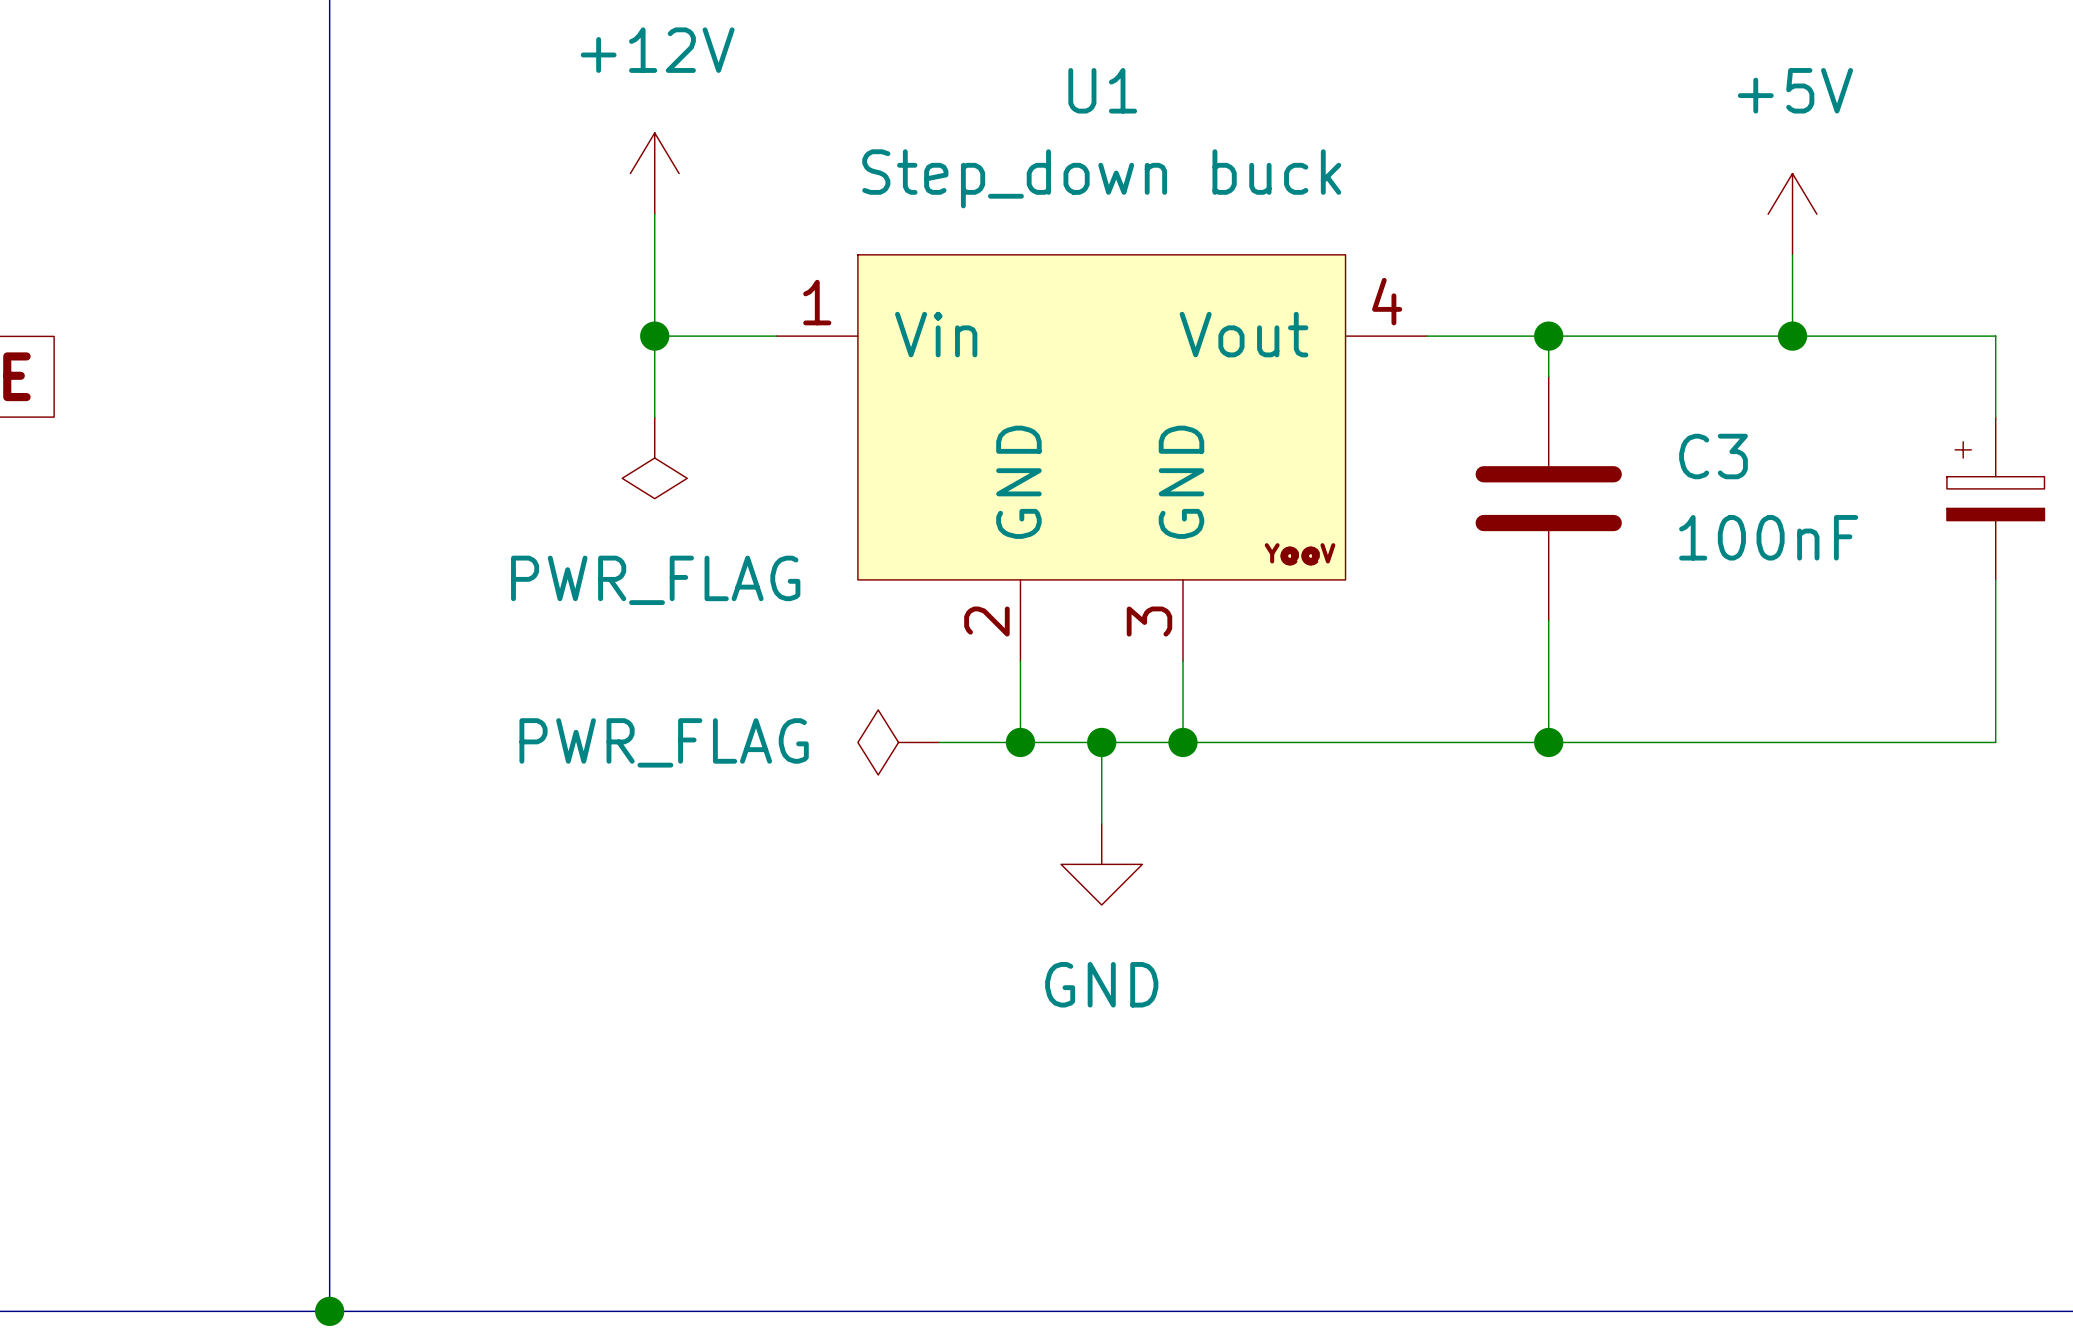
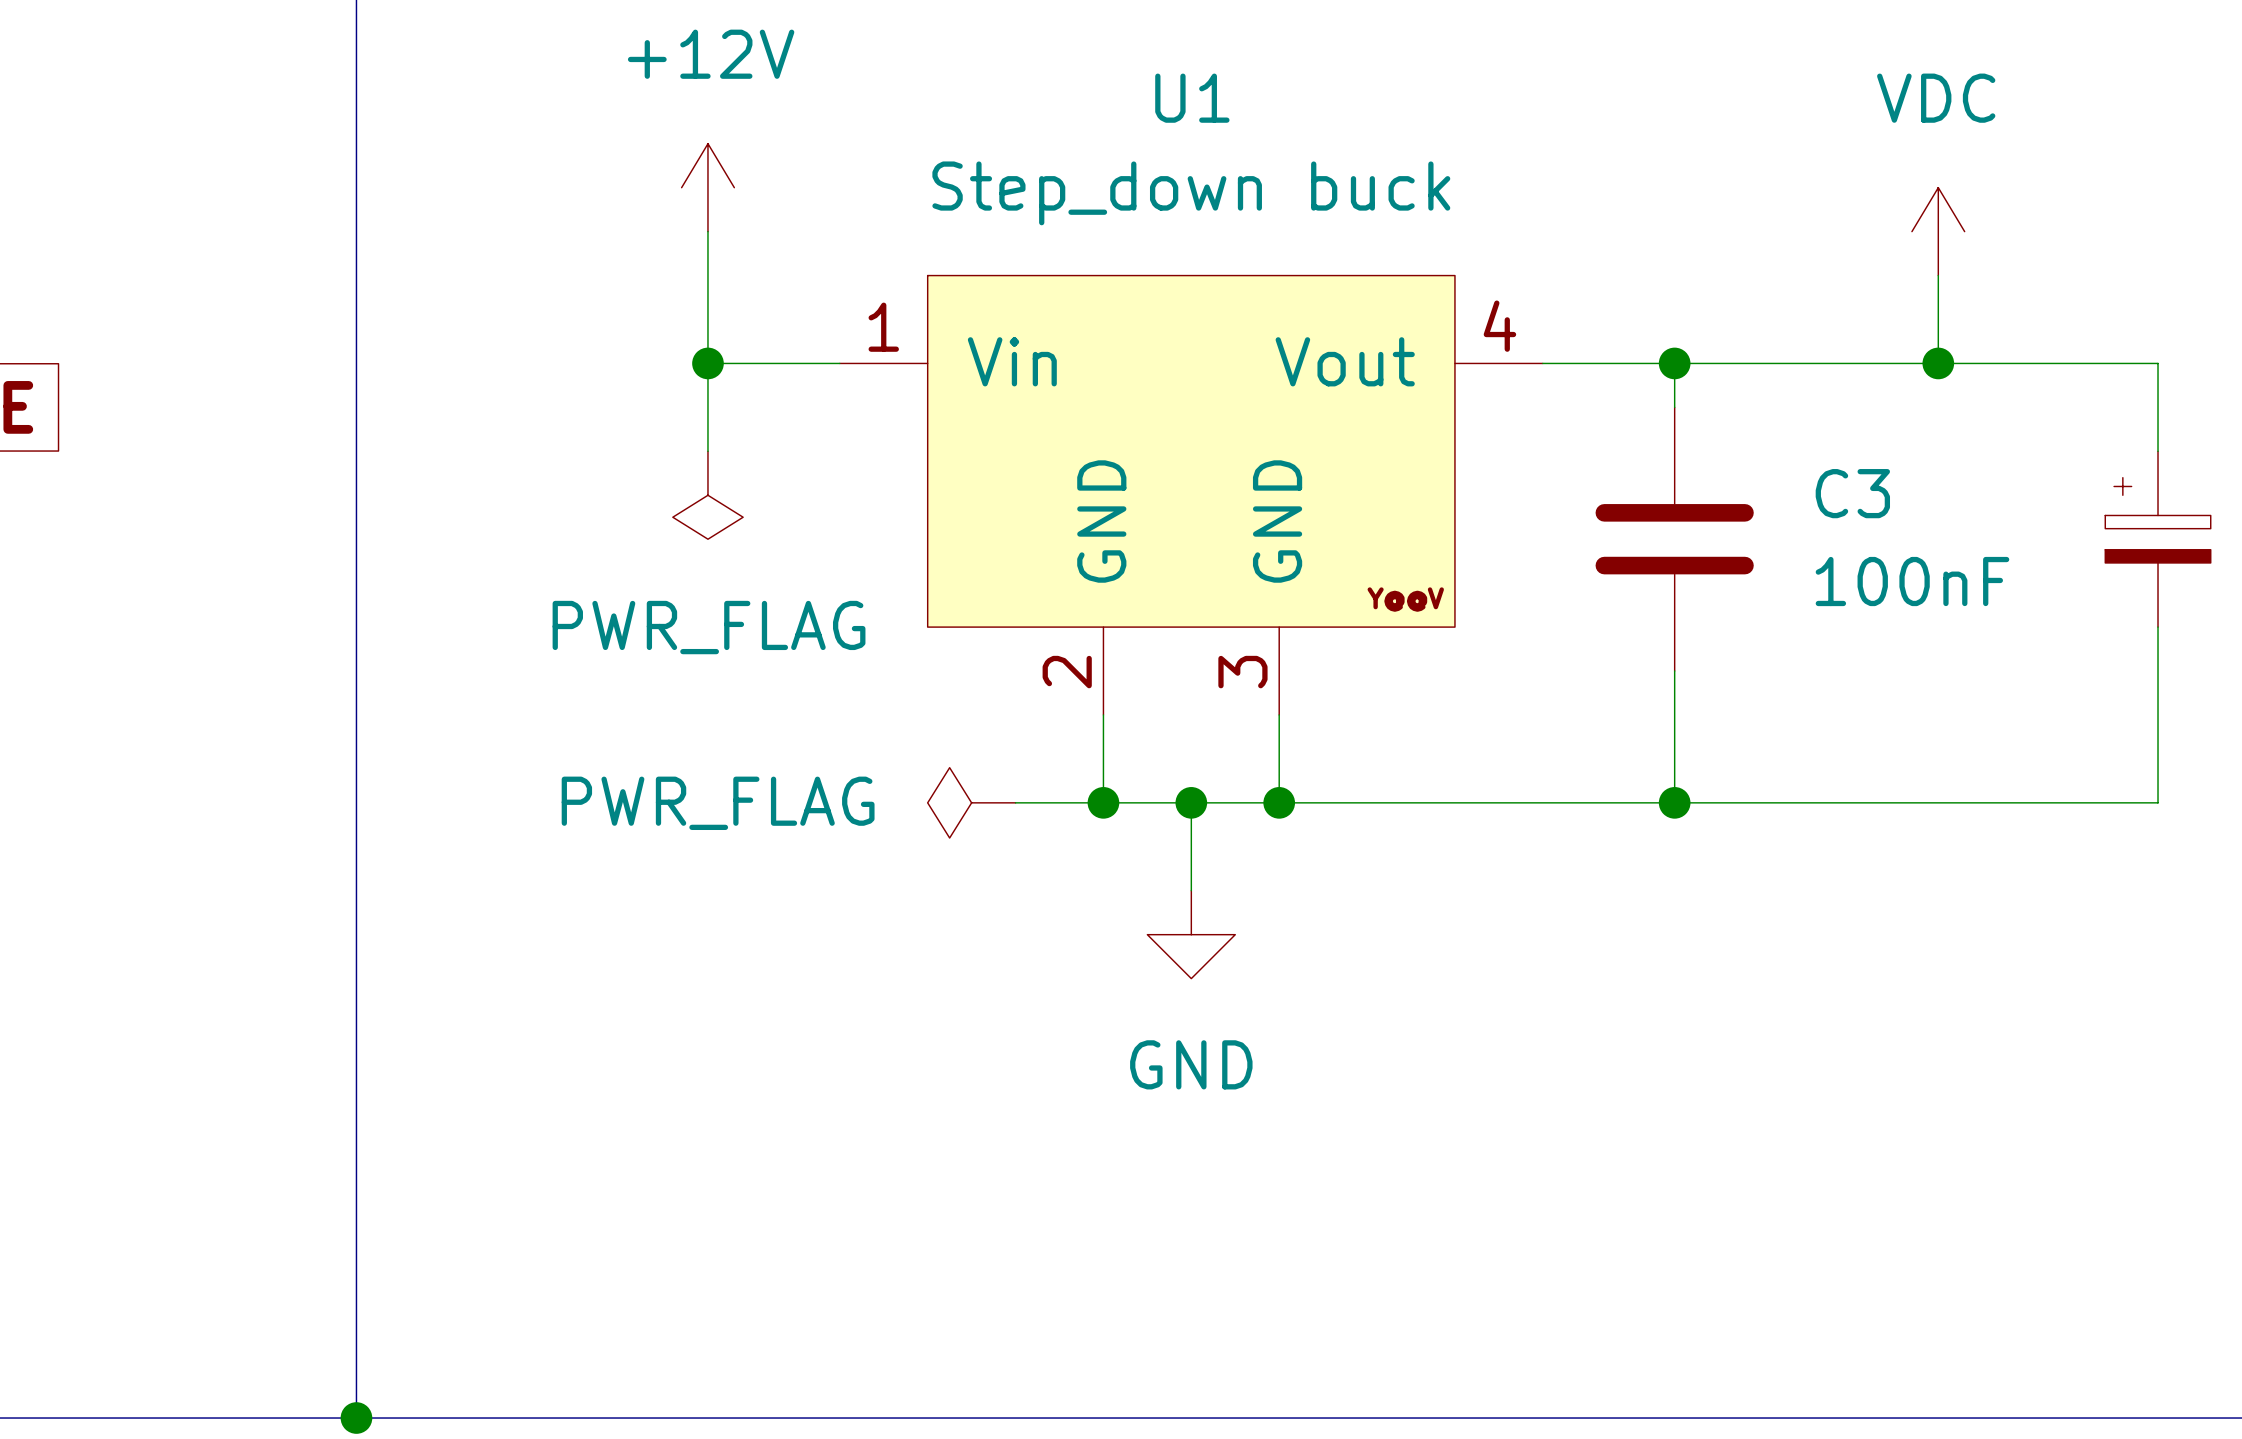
power symbol: +5V (1792, 214) -> VDC (1938, 231)

